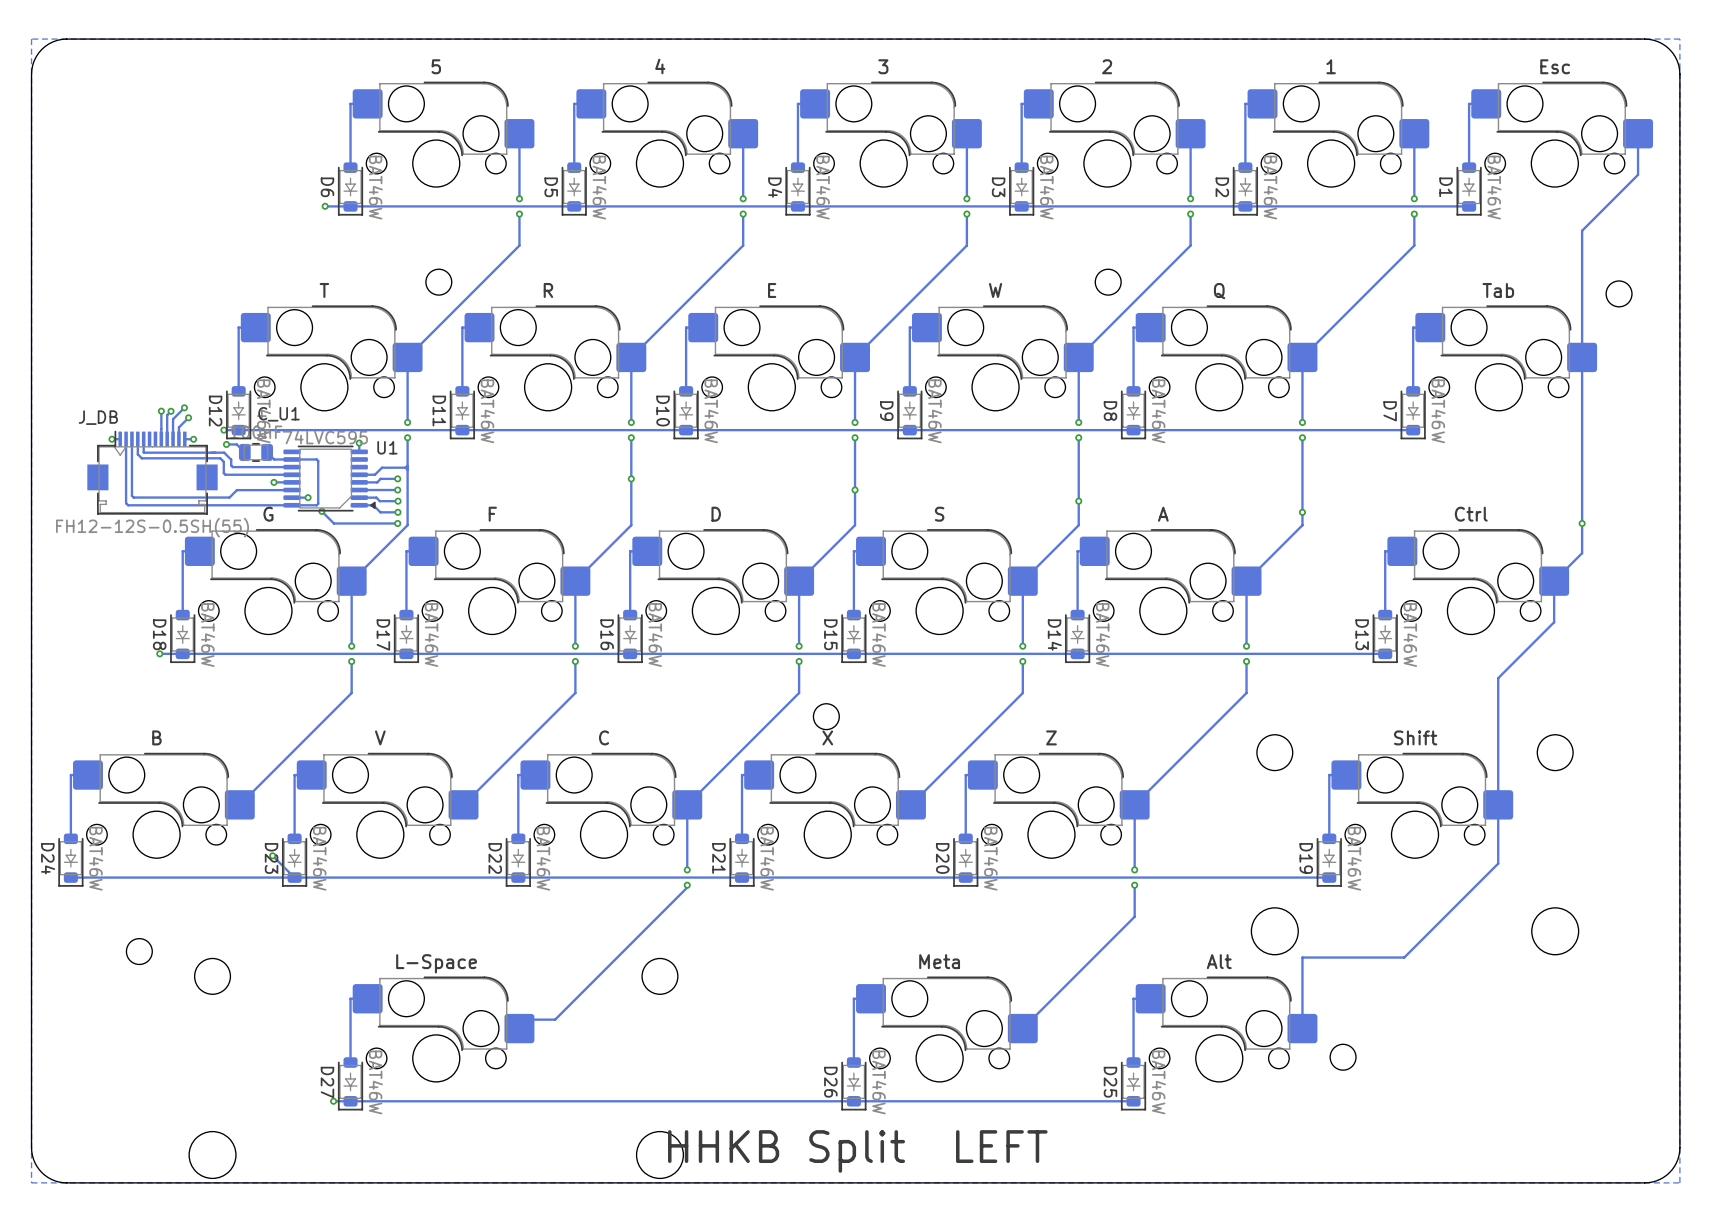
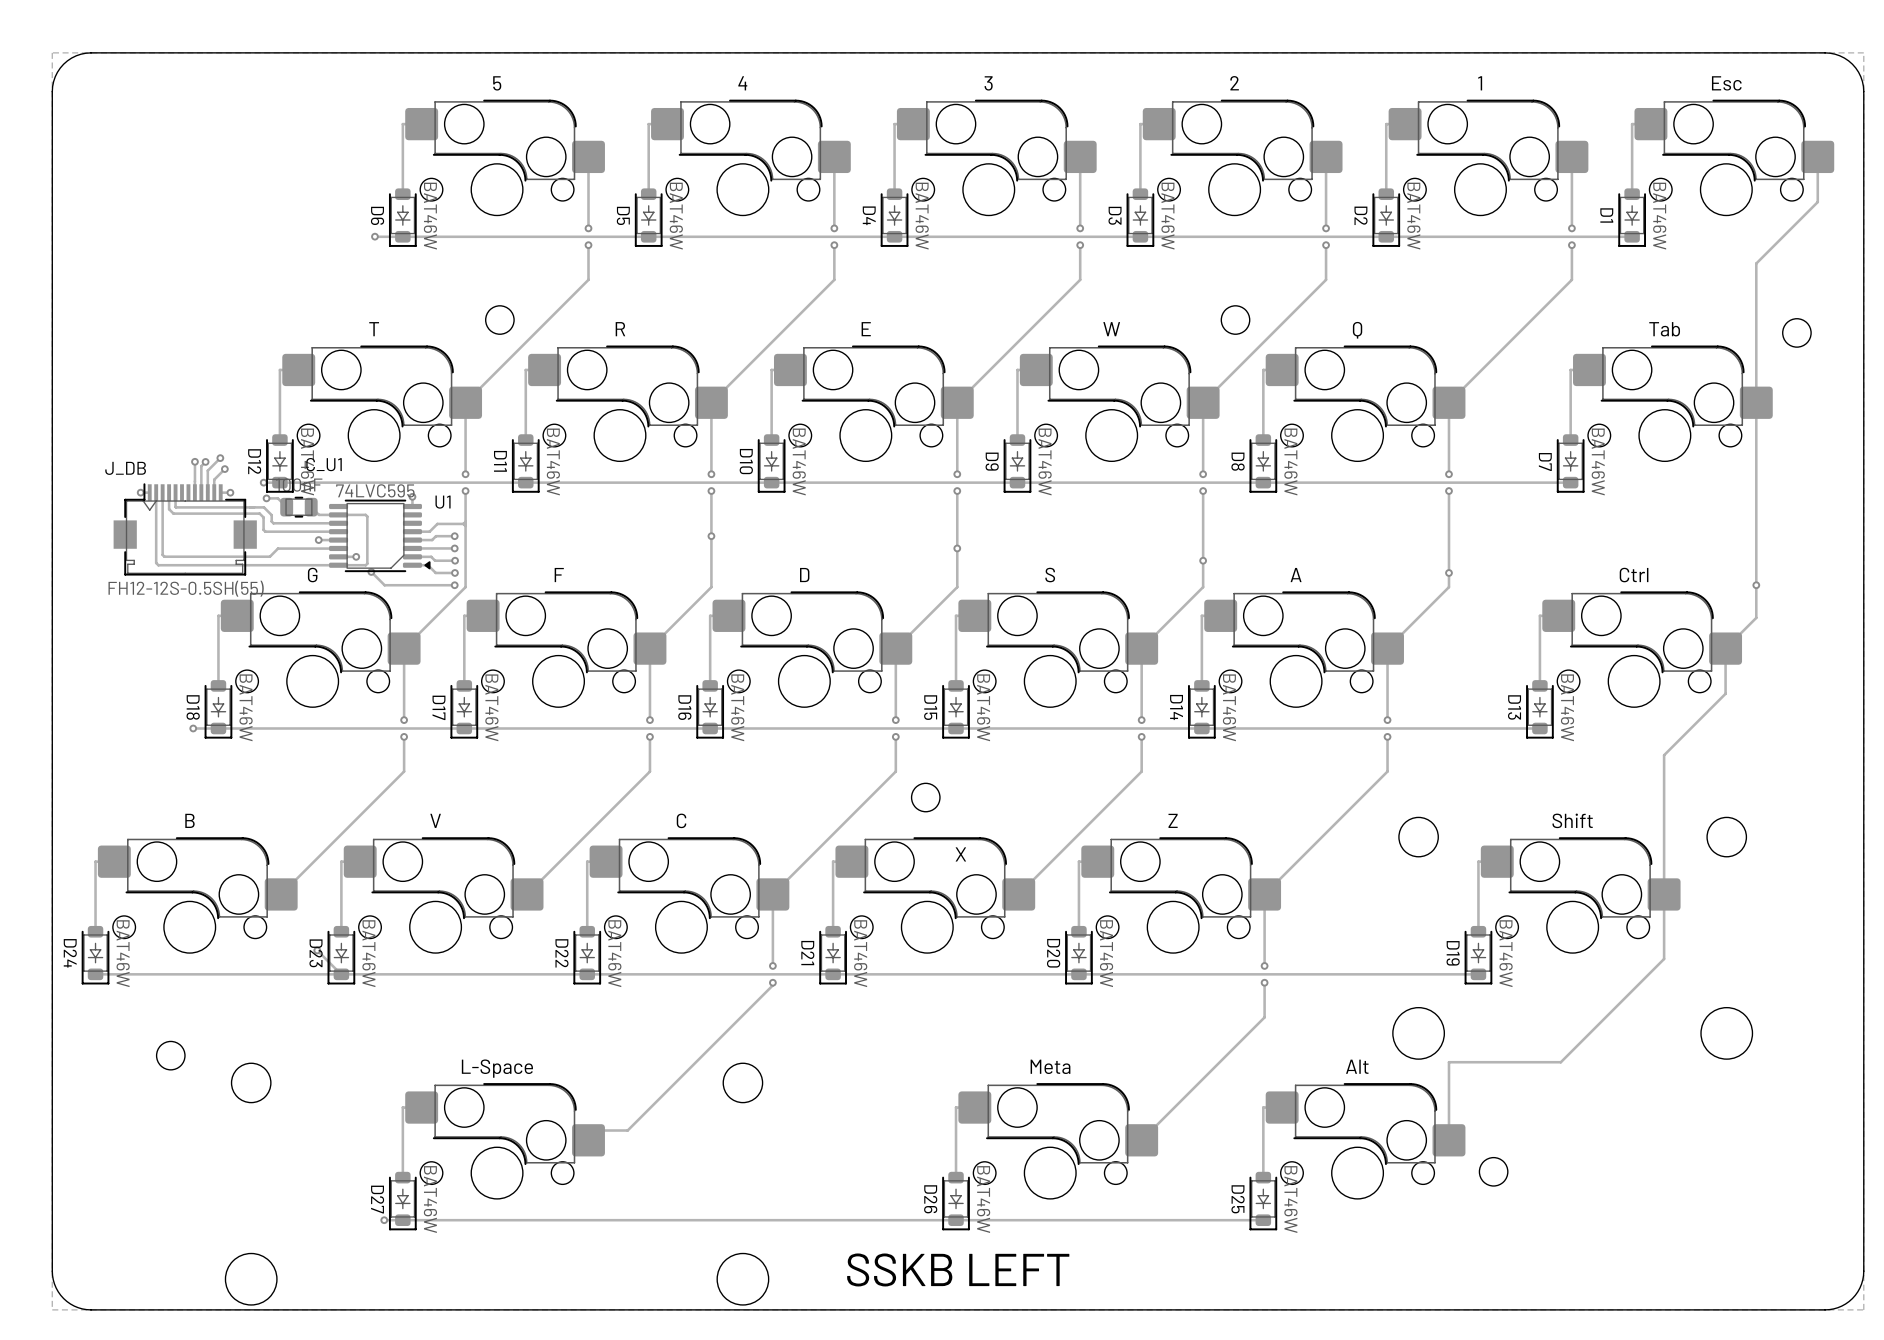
text position: X (827, 737) -> X (960, 854)
text: HHKB Split LEFT (857, 1151) -> SSKB LEFT (958, 1269)

